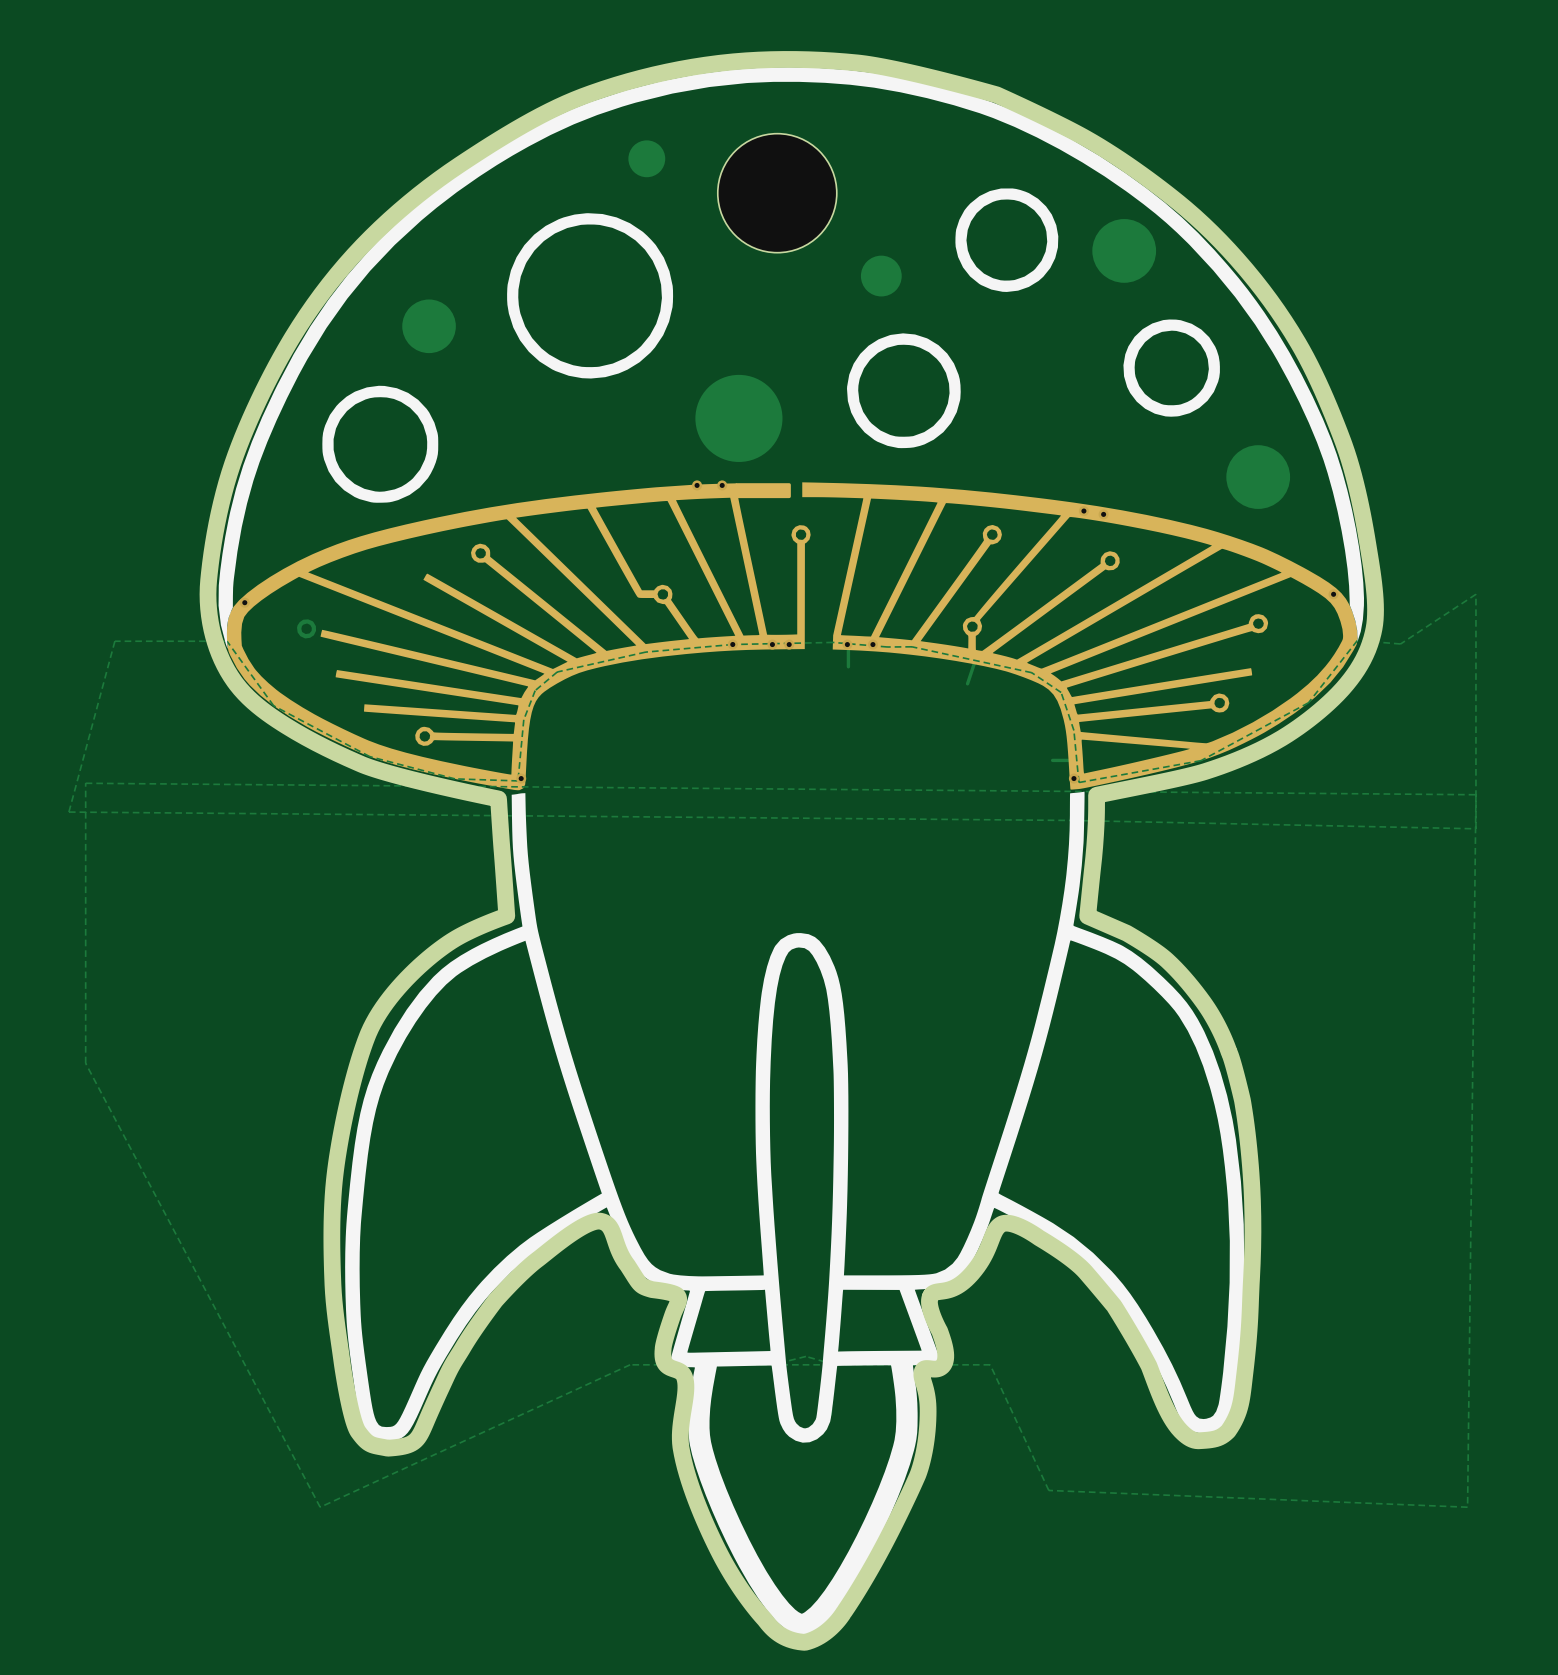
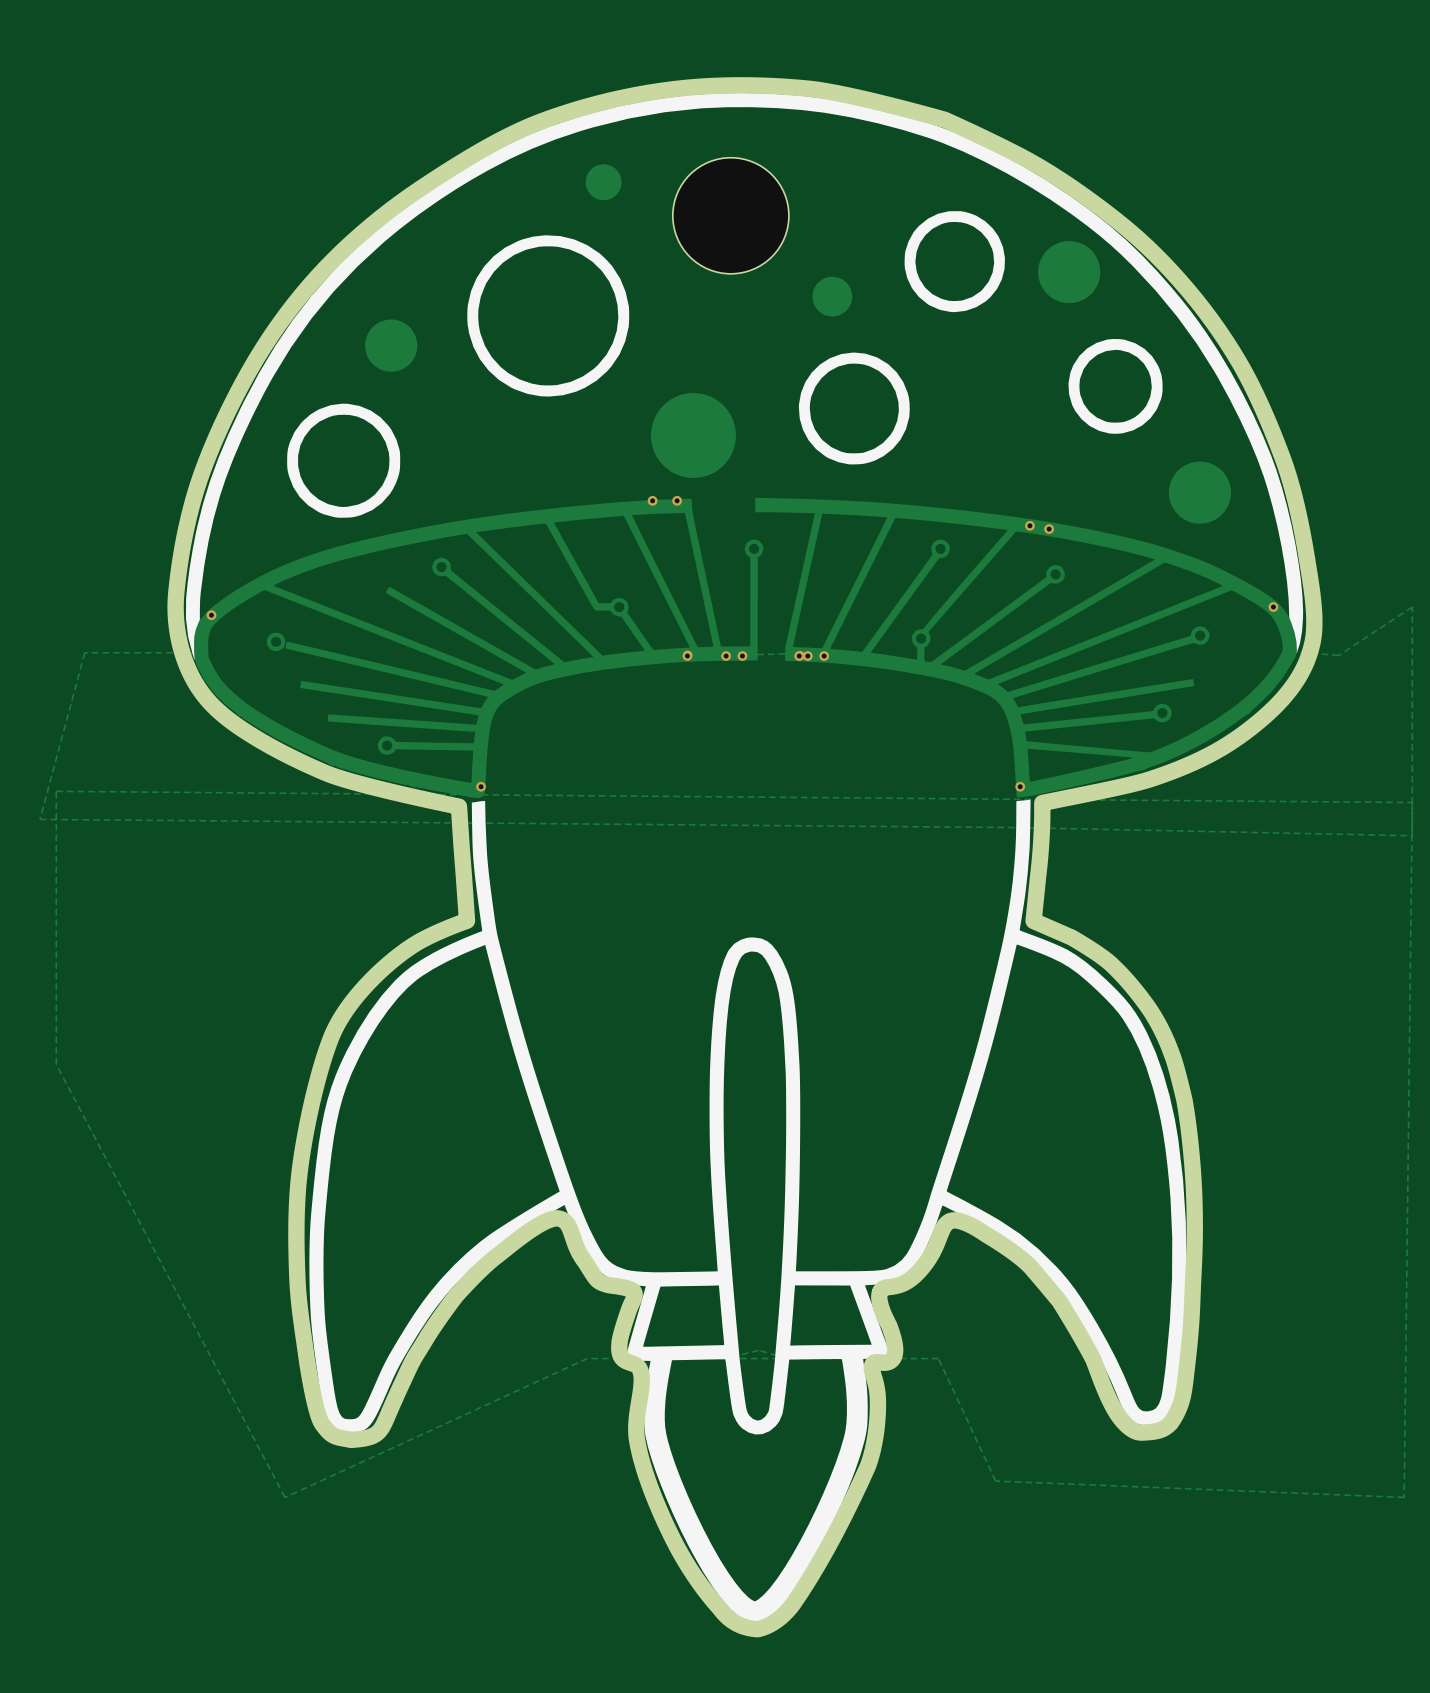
part footprint: [199, 51, 1384, 1651] -> [167, 77, 1323, 1638]
track: (848, 642) (848, 666) -> none
via: none -> (807, 656)
track: (976, 658) (967, 683) -> none
track: (1052, 760) (1078, 760) -> none

